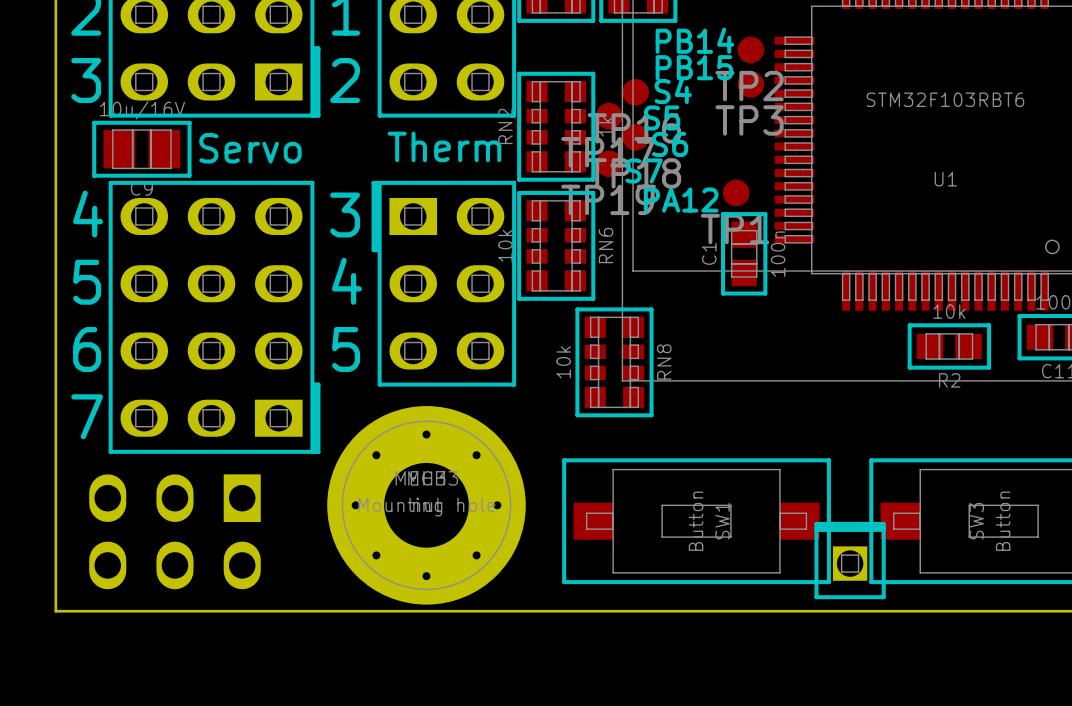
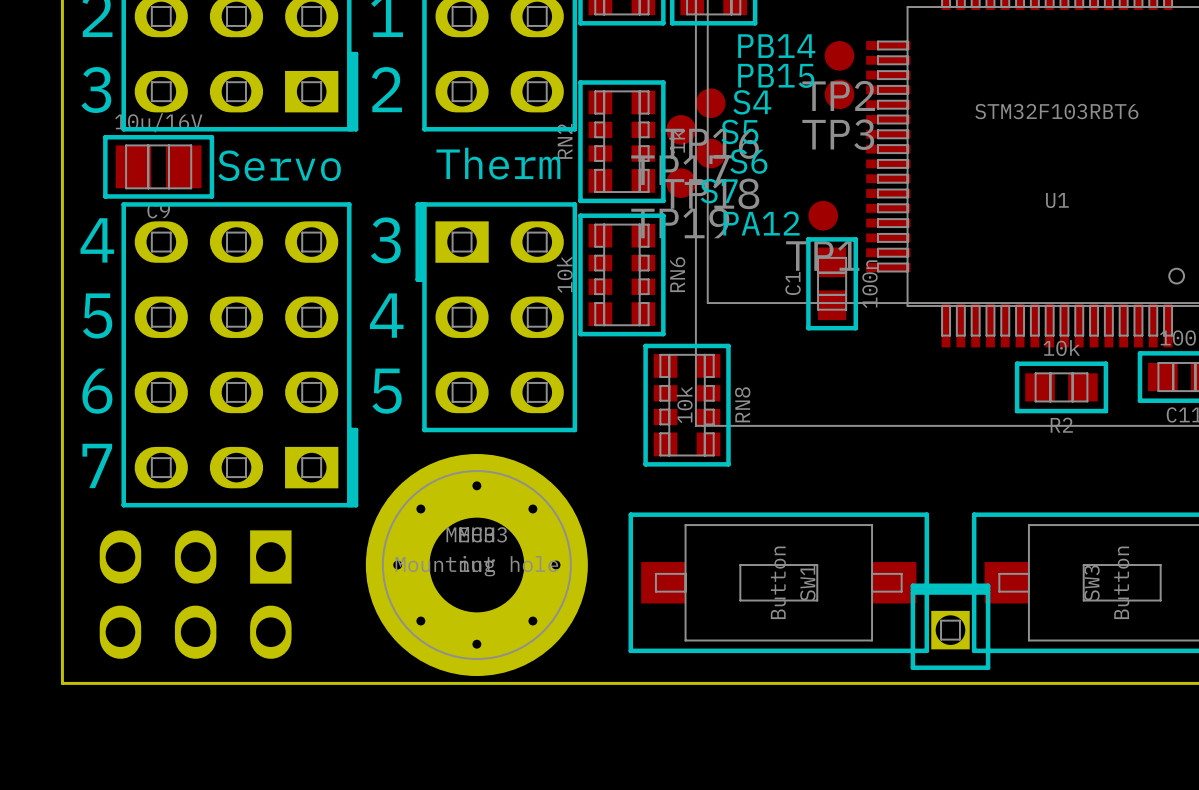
RN8 value position: 10k (563, 362) -> 10k (684, 404)

